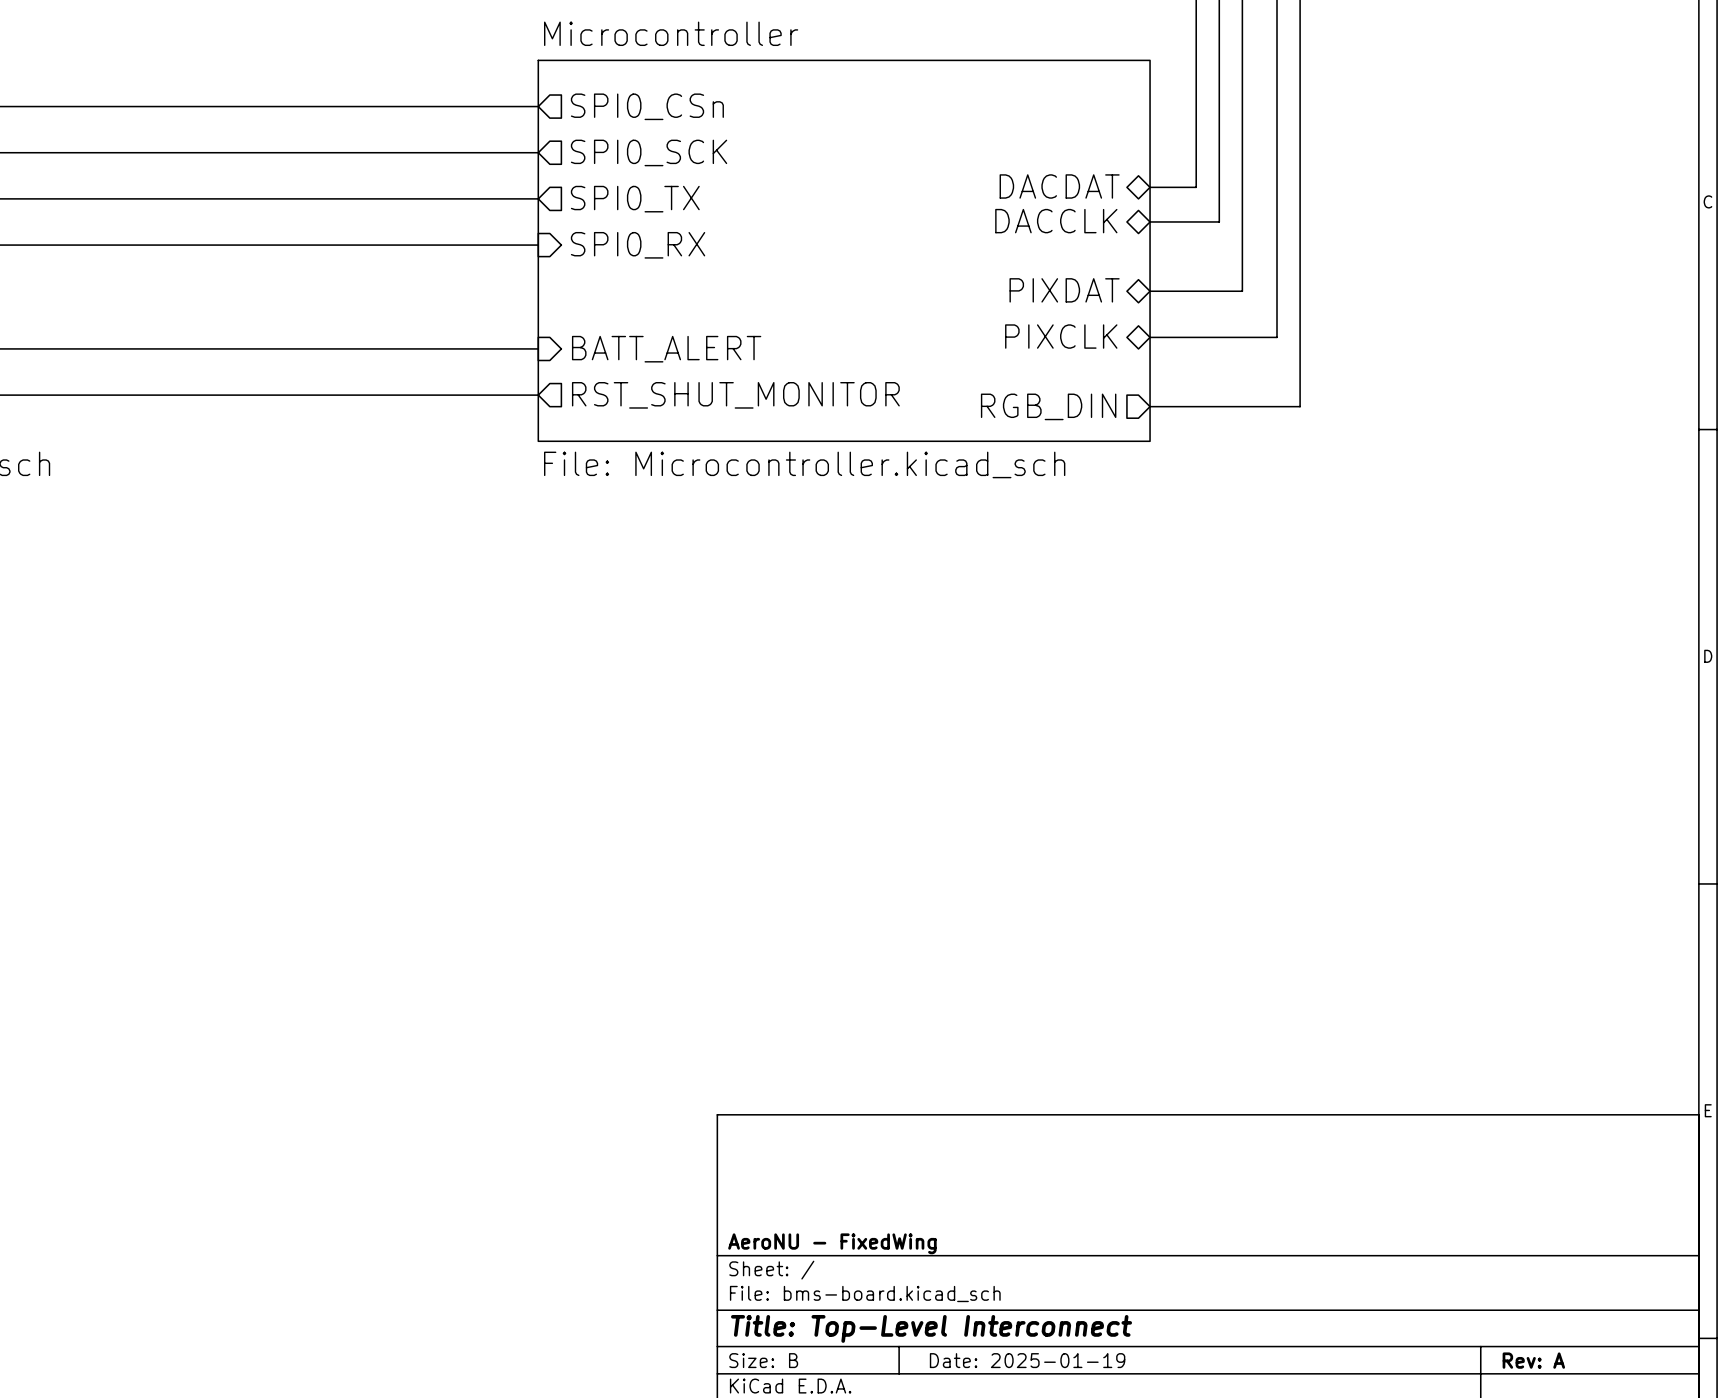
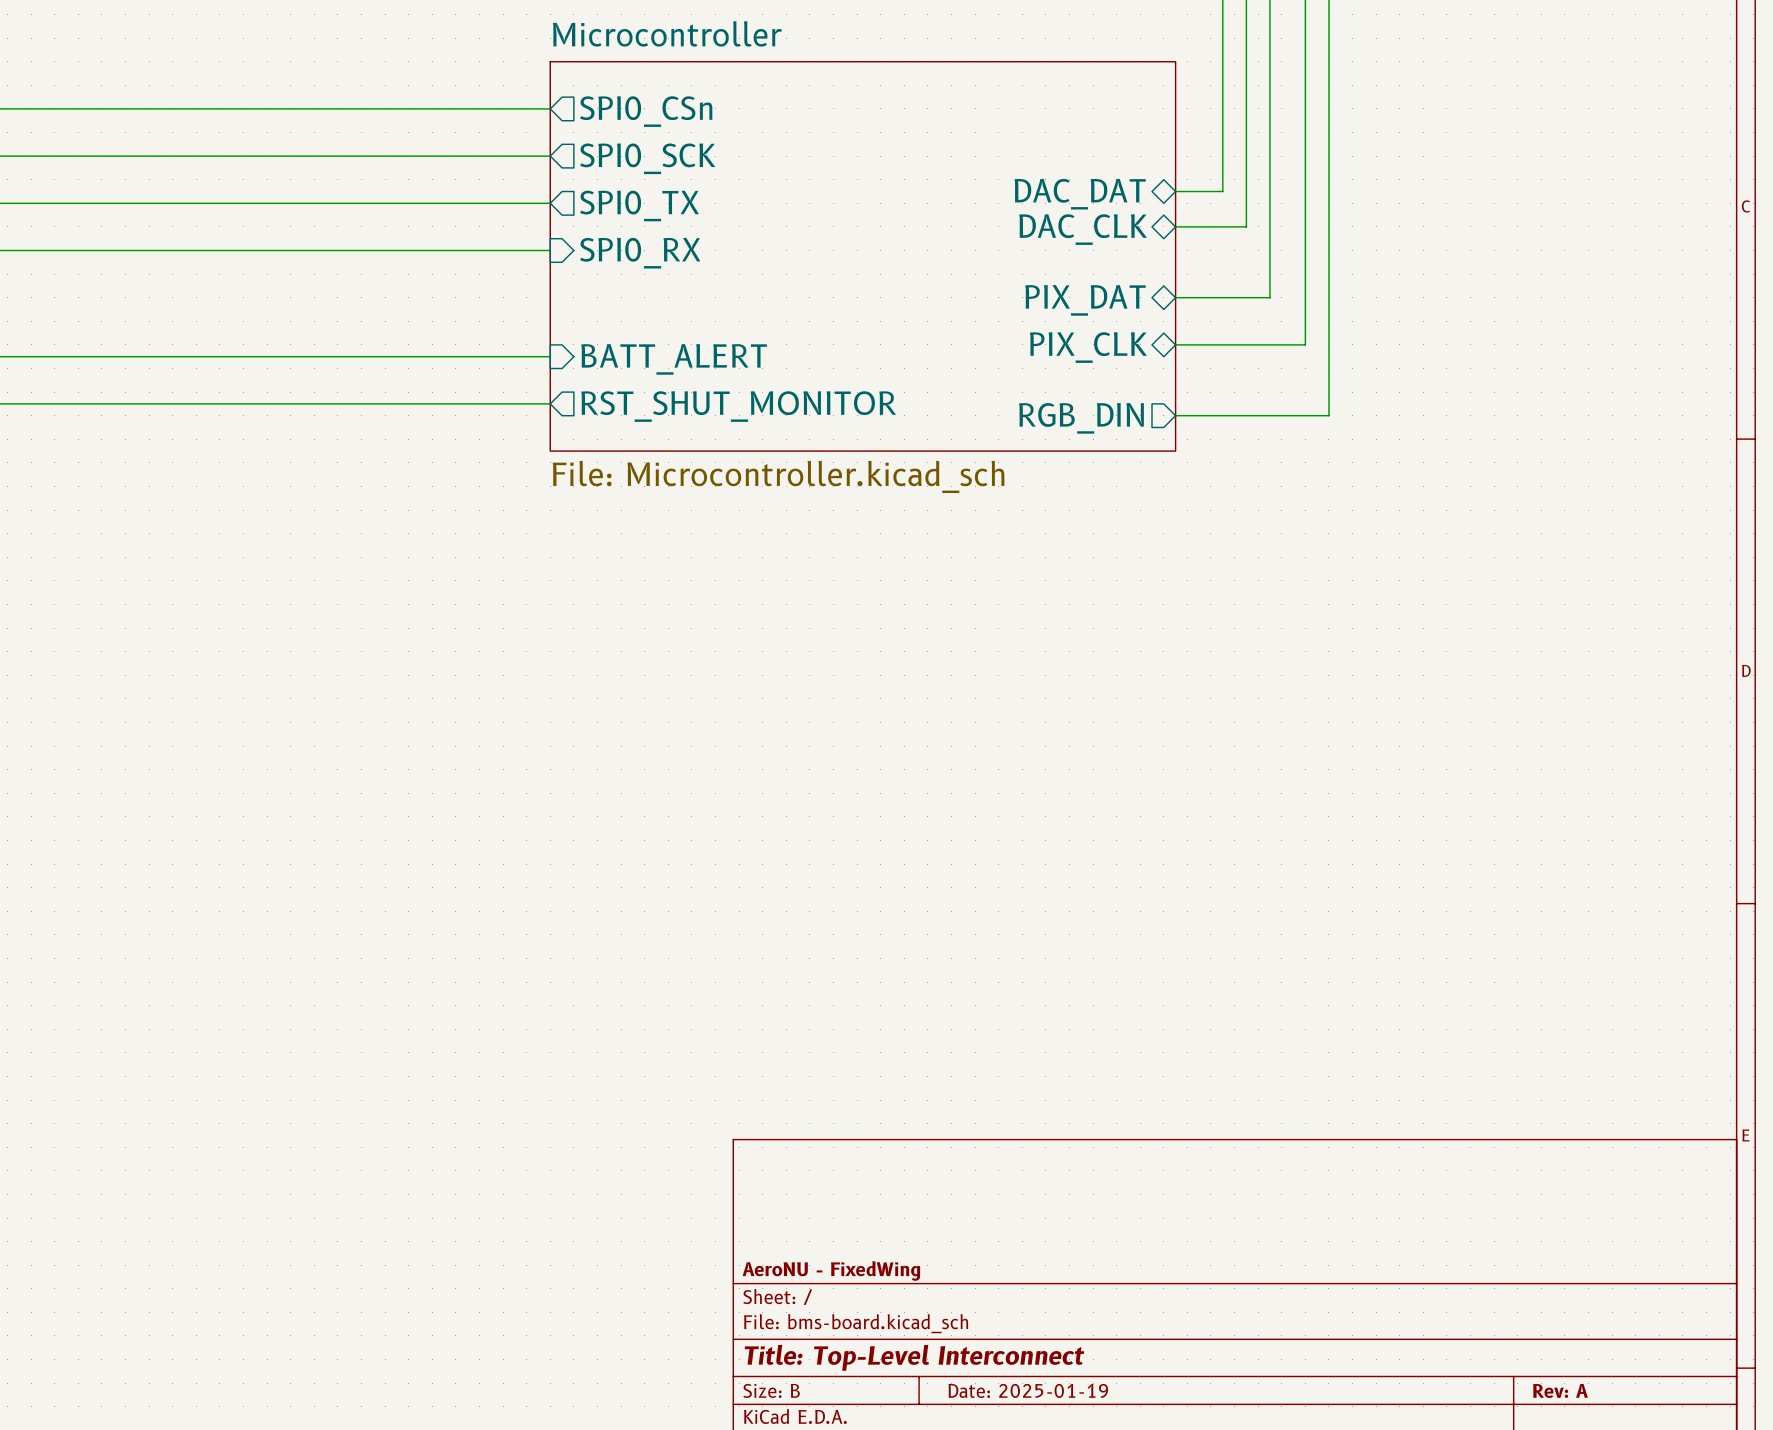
sheet pin: DACDAT (1059, 186) -> DAC_DAT (1080, 194)
sheet pin: DACCLK (1056, 221) -> DAC_CLK (1083, 229)
sheet pin: PIXDAT (1064, 290) -> PIX_DAT (1085, 300)
sheet pin: PIXCLK (1061, 336) -> PIX_CLK (1088, 347)

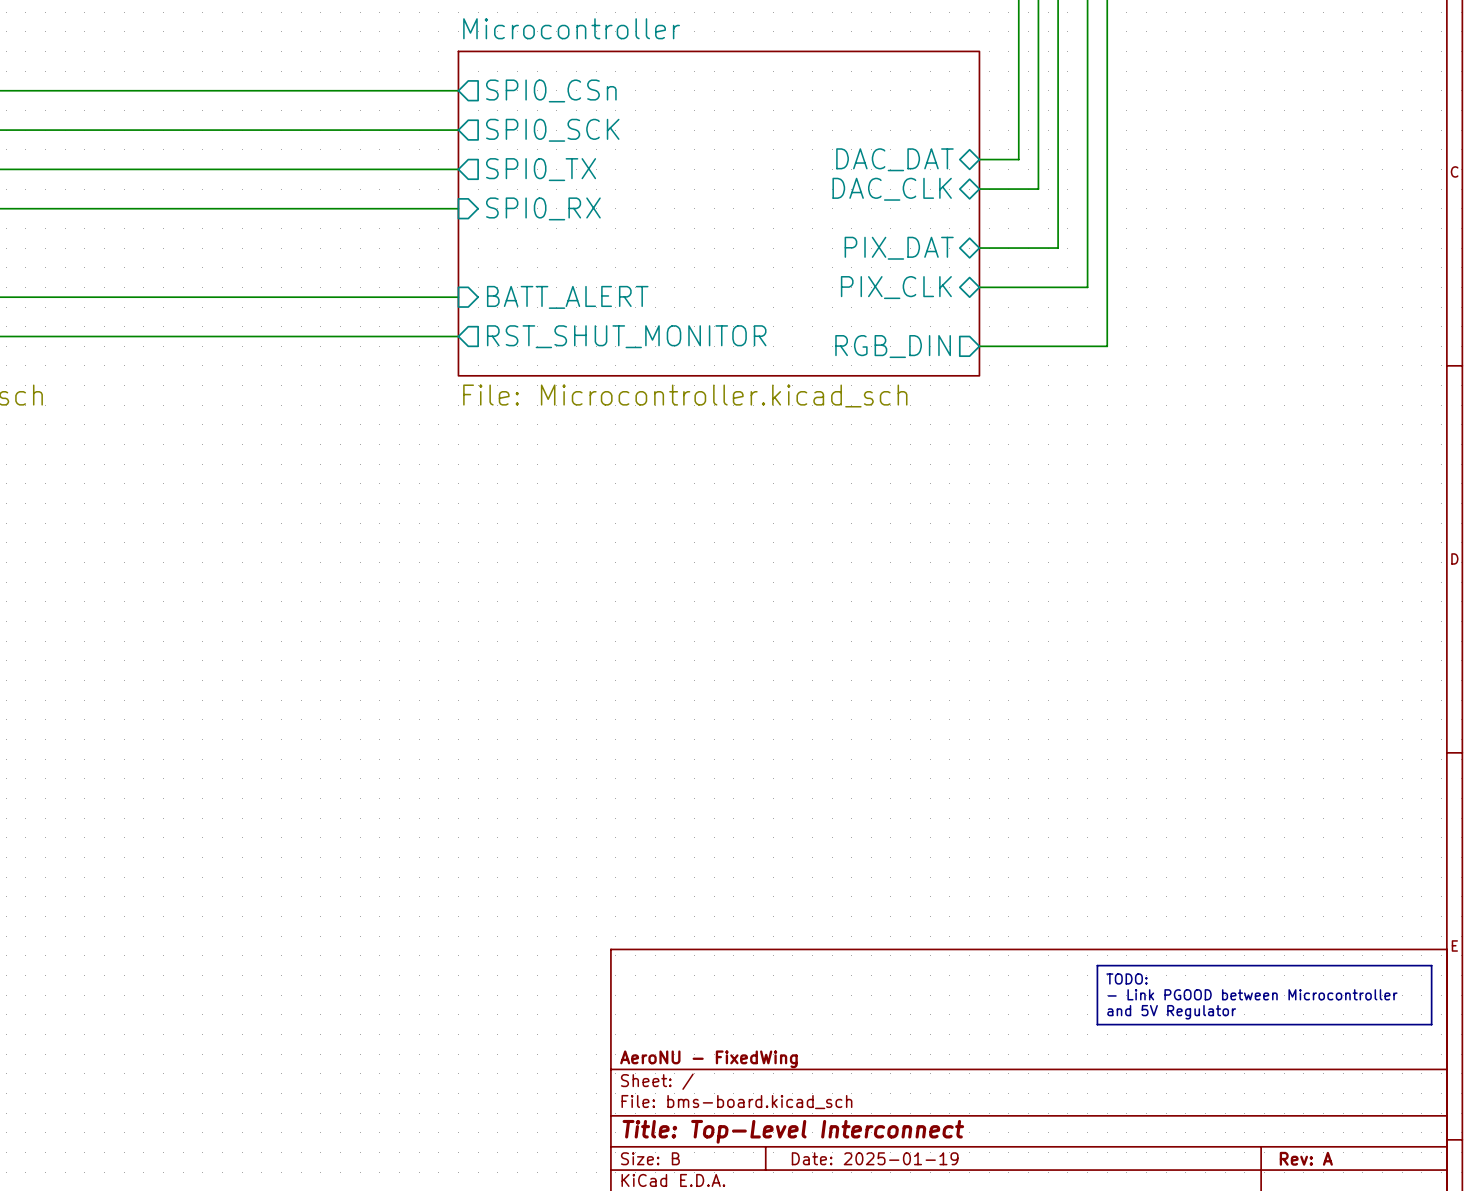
line: none -> (1097, 965) (1431, 965) (1431, 1024) (1097, 1024) (1097, 965)
text: none -> TODO: (1126, 978)
text: none -> - Link PGOOD between Microcontroller (1252, 994)
text: none -> and 5V Regulator (1171, 1012)

